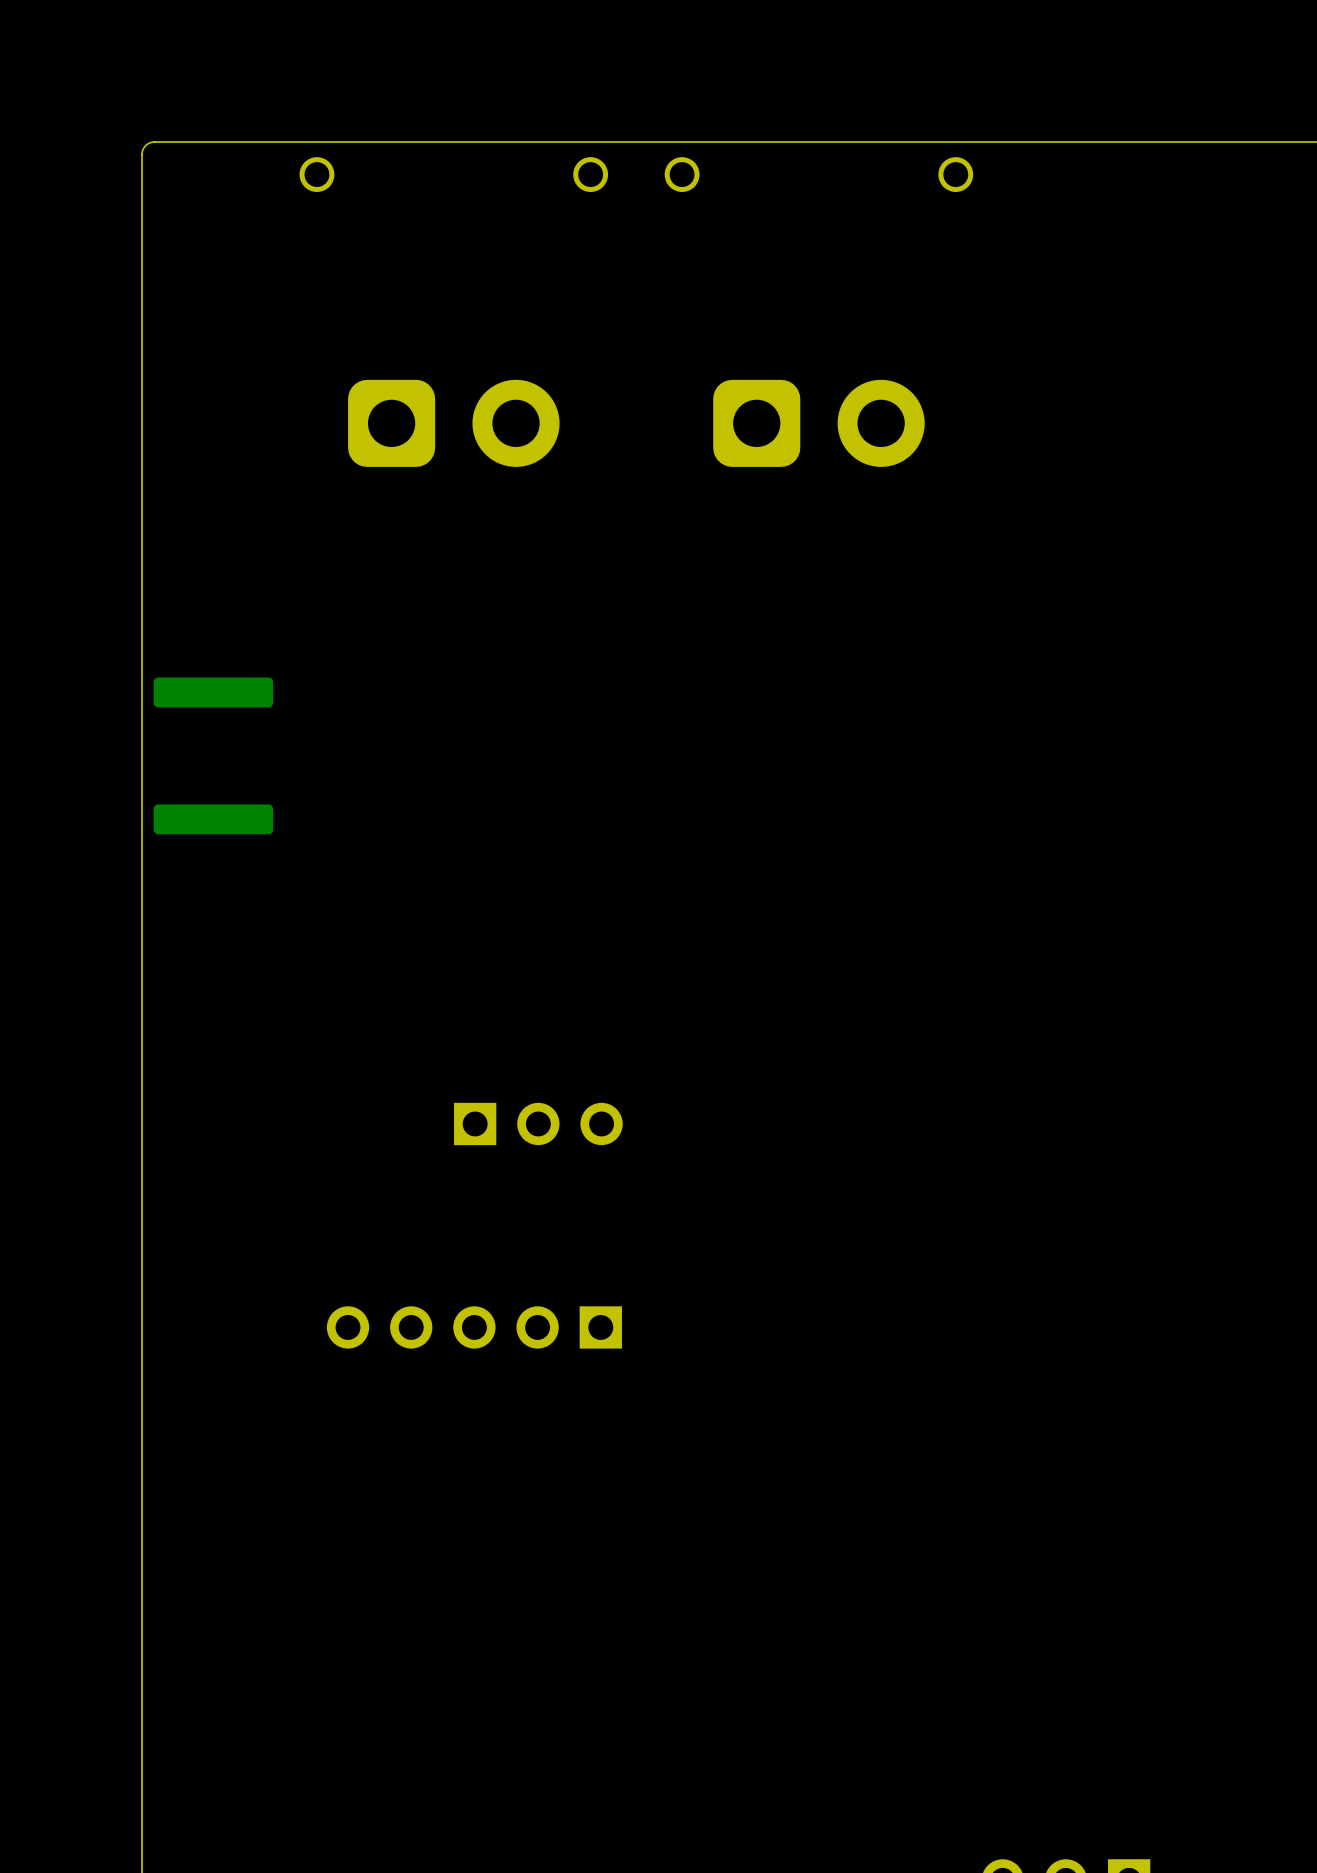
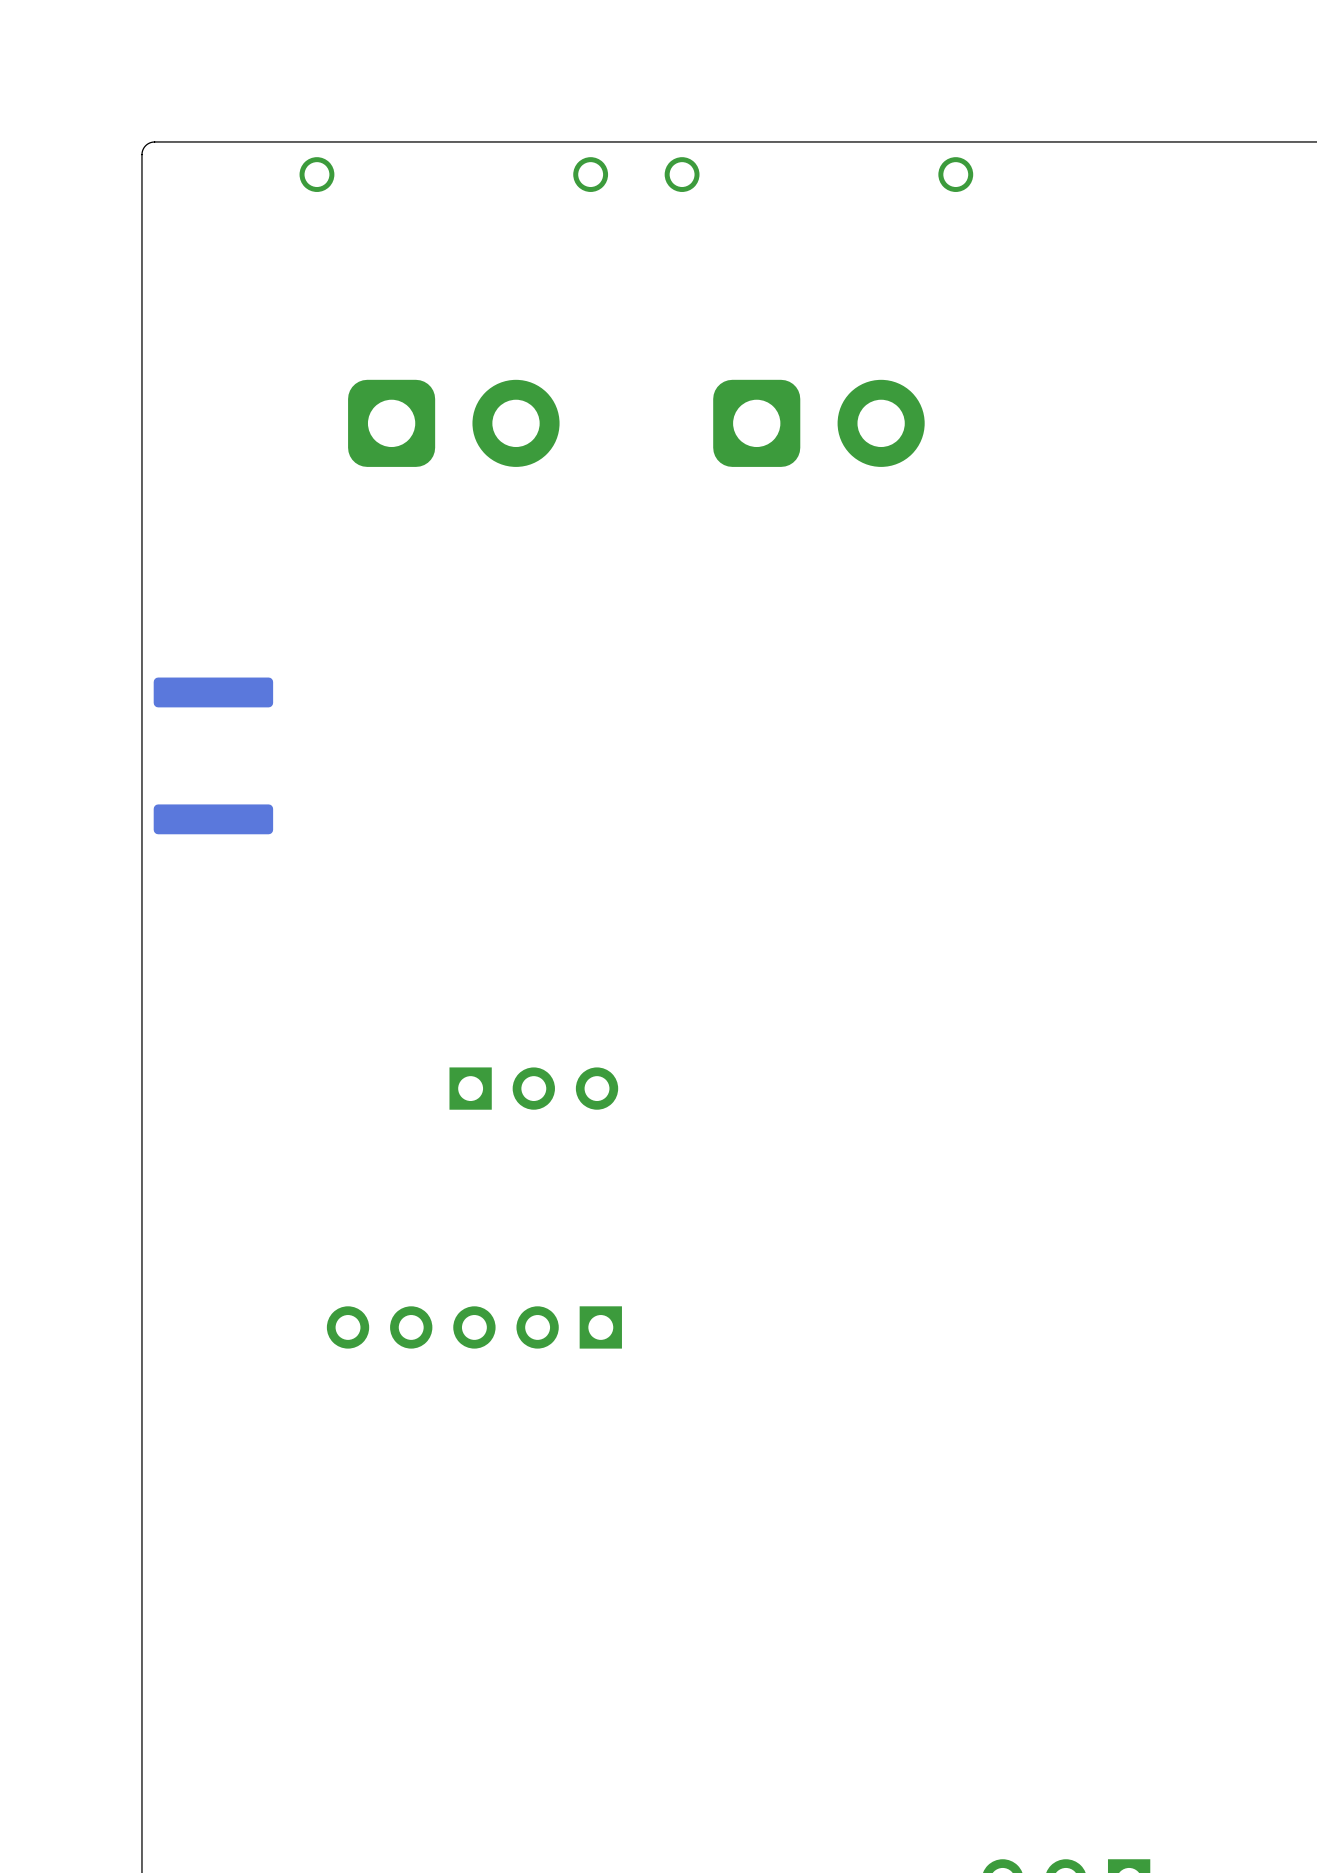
part position: (538, 1123) -> (533, 1088)

